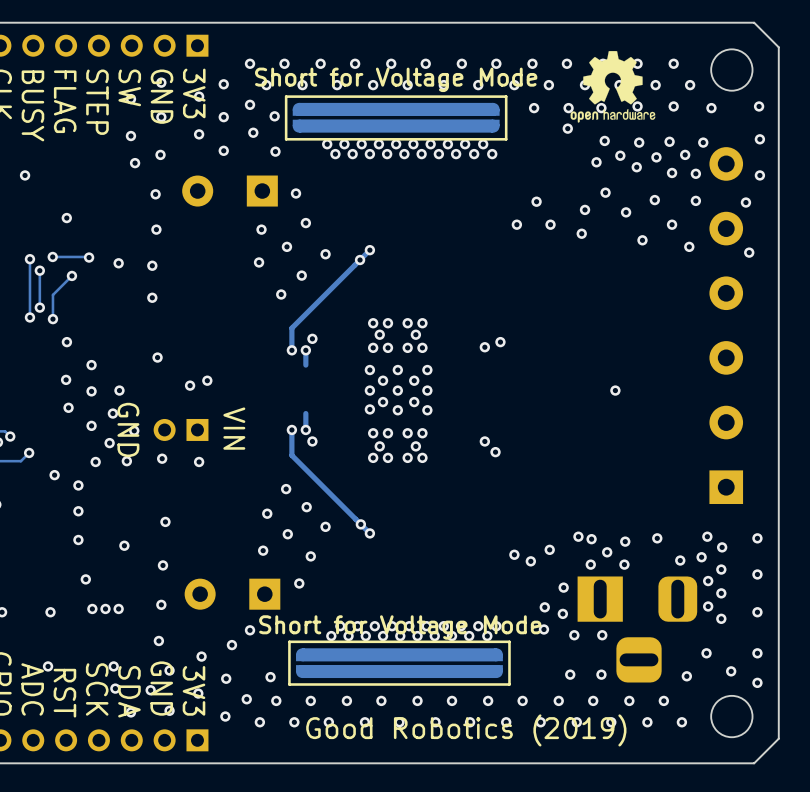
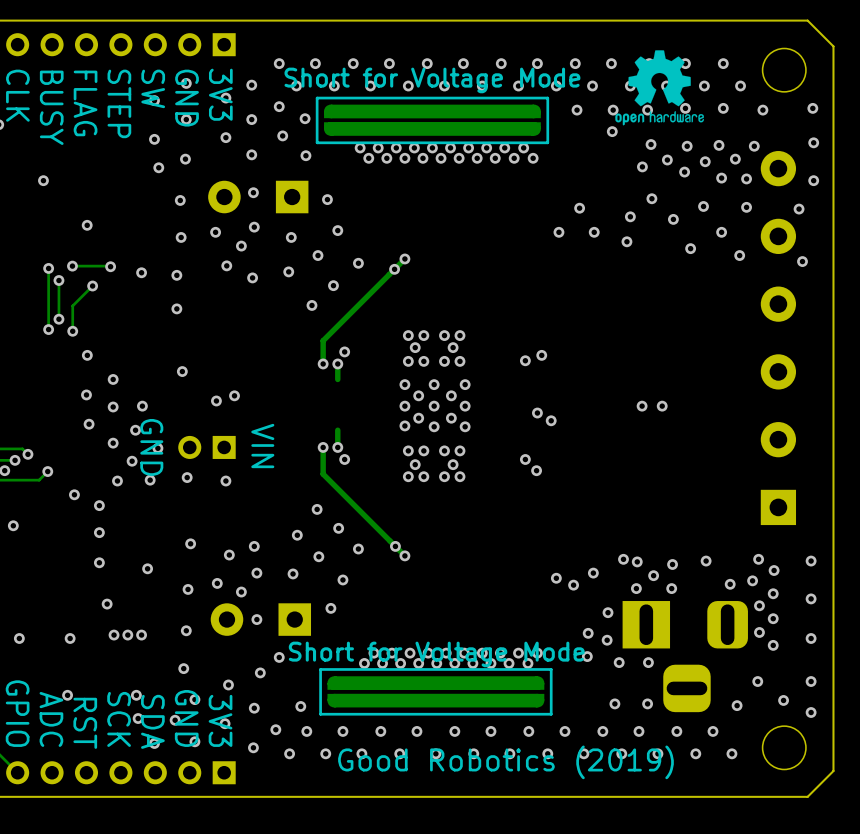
via: none -> (253, 192)
via: none -> (254, 227)
via: none -> (215, 232)
via: none -> (241, 246)
via: none -> (226, 265)
via: none -> (252, 277)
via: none -> (642, 406)
via: none -> (537, 413)
via: none -> (551, 420)
via: none -> (254, 546)
via: none -> (229, 555)
via: none -> (256, 573)
via: none -> (217, 583)
via: none -> (241, 592)
via: none -> (256, 619)

